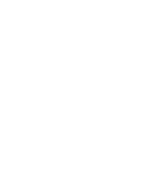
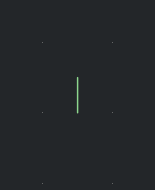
wire: none -> (77, 77) (77, 112)

